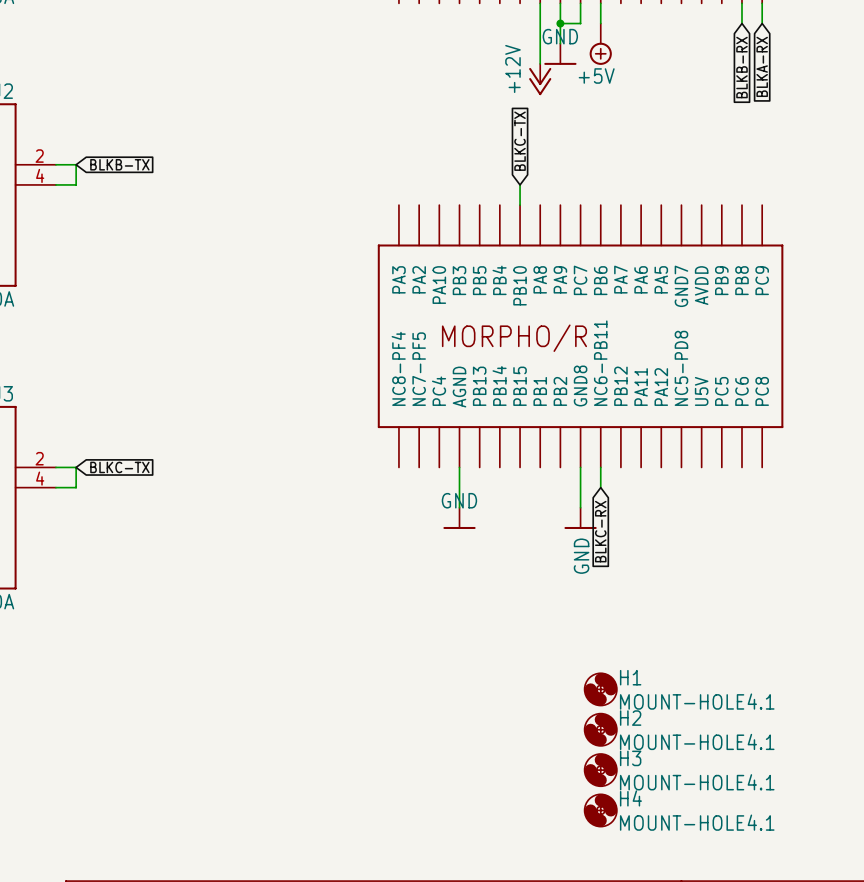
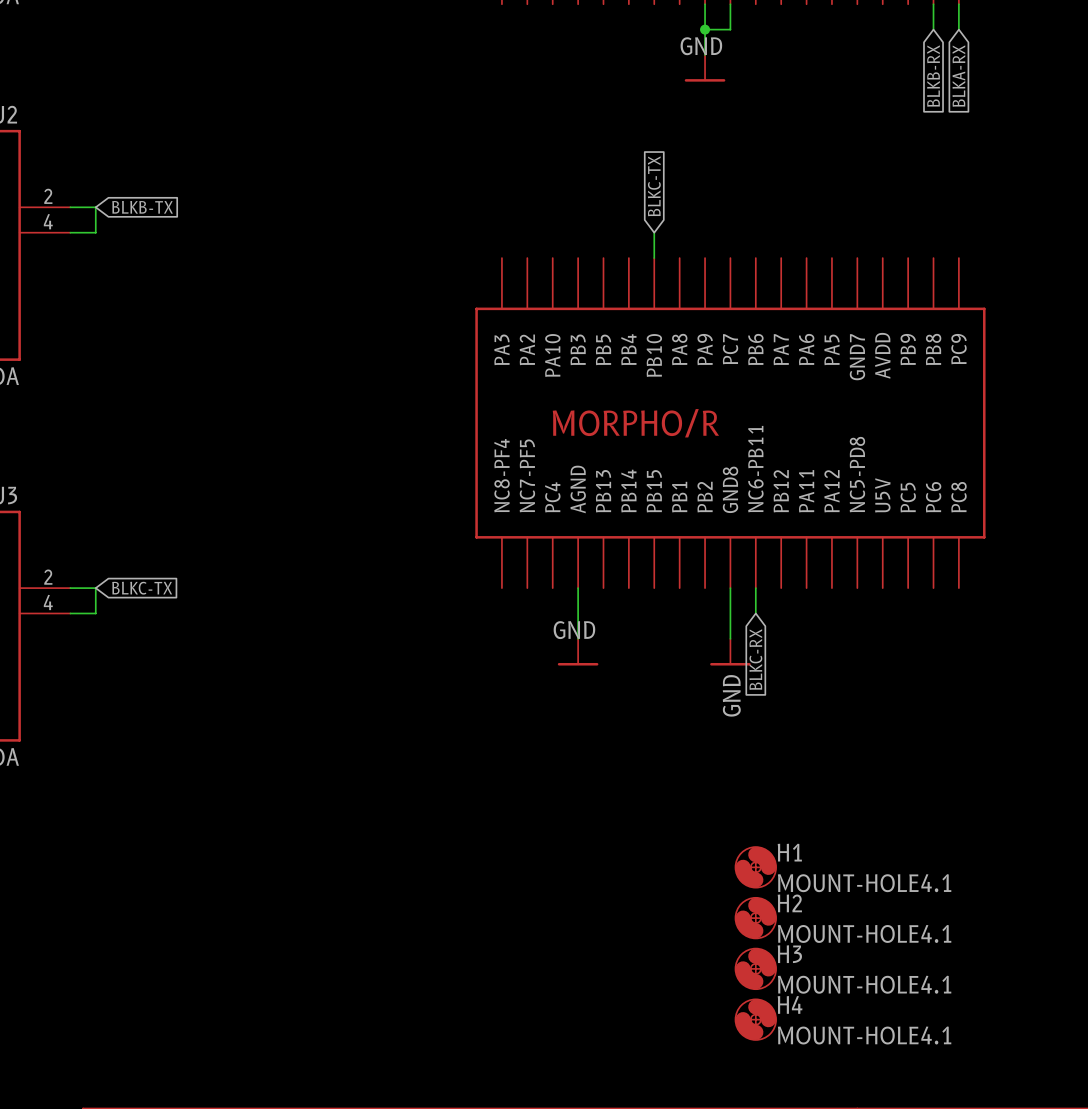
wire: (540, 3) (540, 63) -> none
wire: (600, 3) (600, 23) -> none
power symbol: +5V (600, 44) -> none
power symbol: +12V (540, 79) -> none

